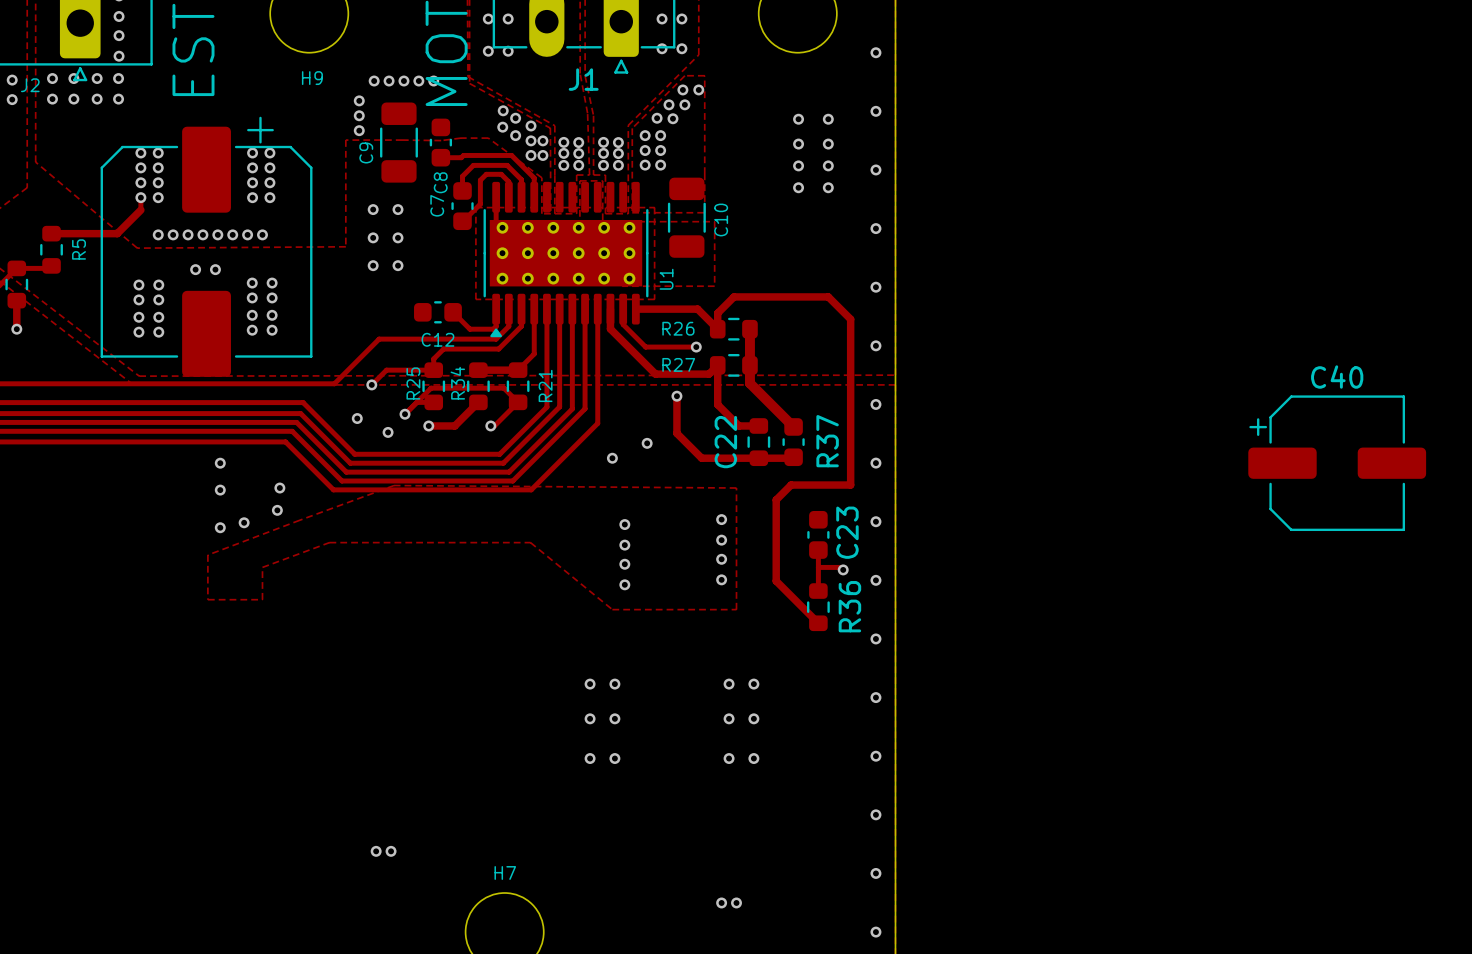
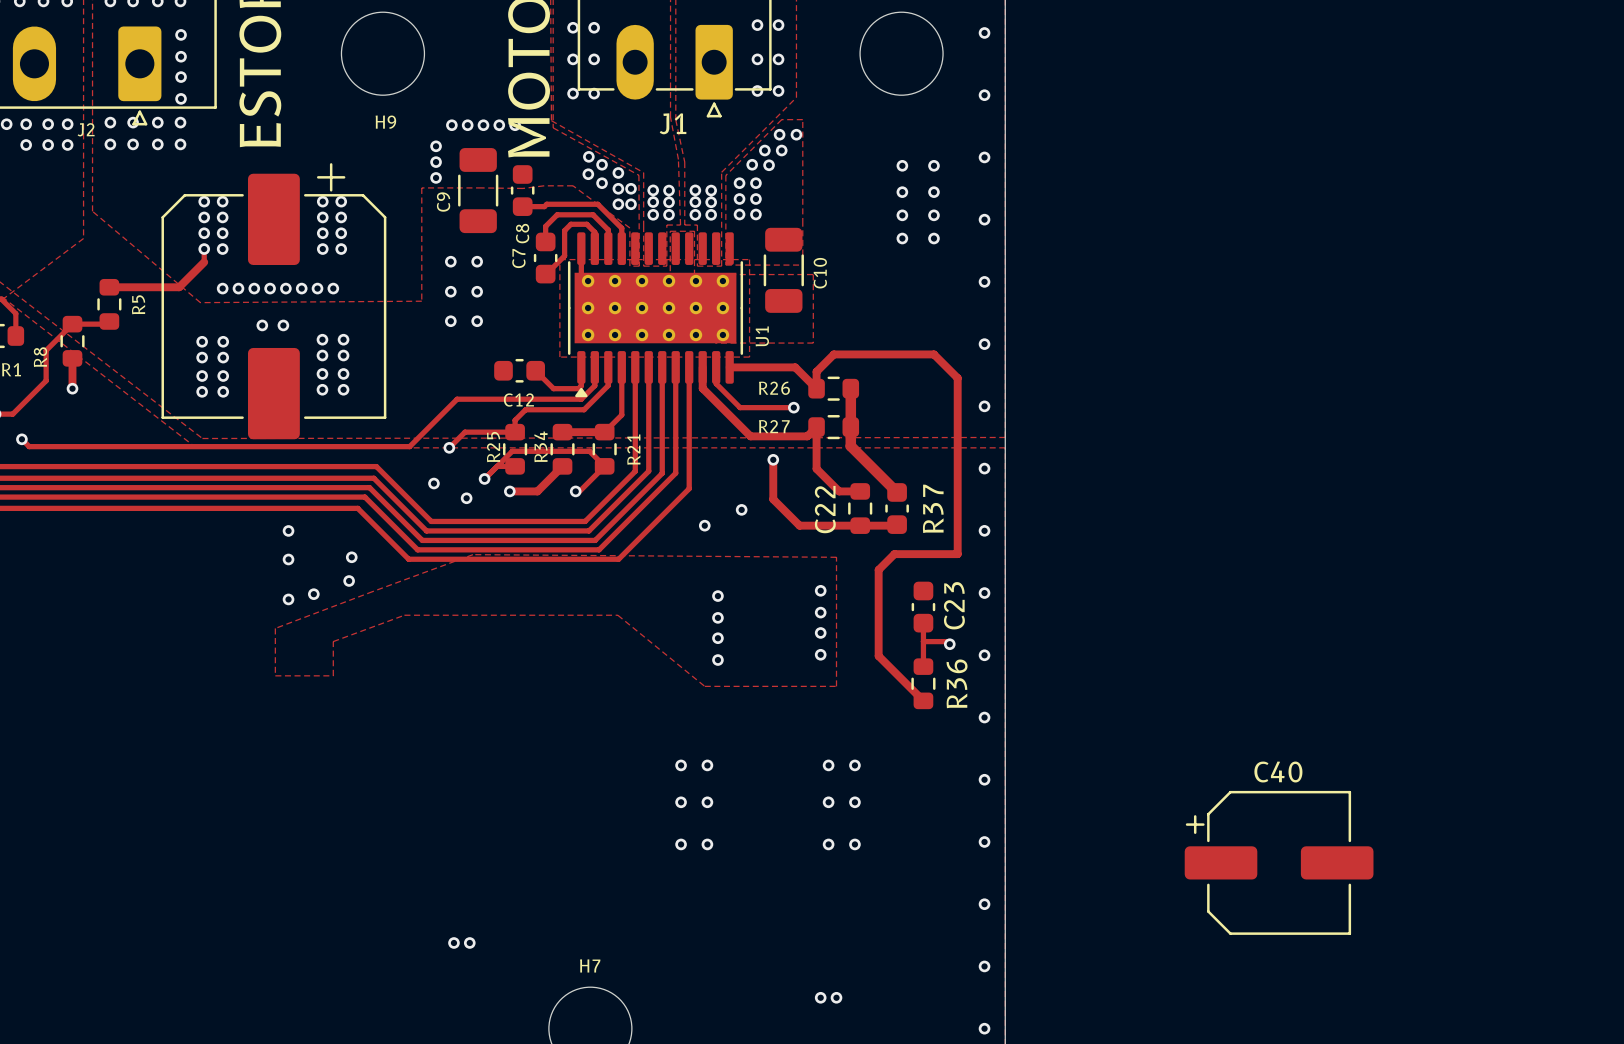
C40 position: (1337, 463) -> (1279, 862)

